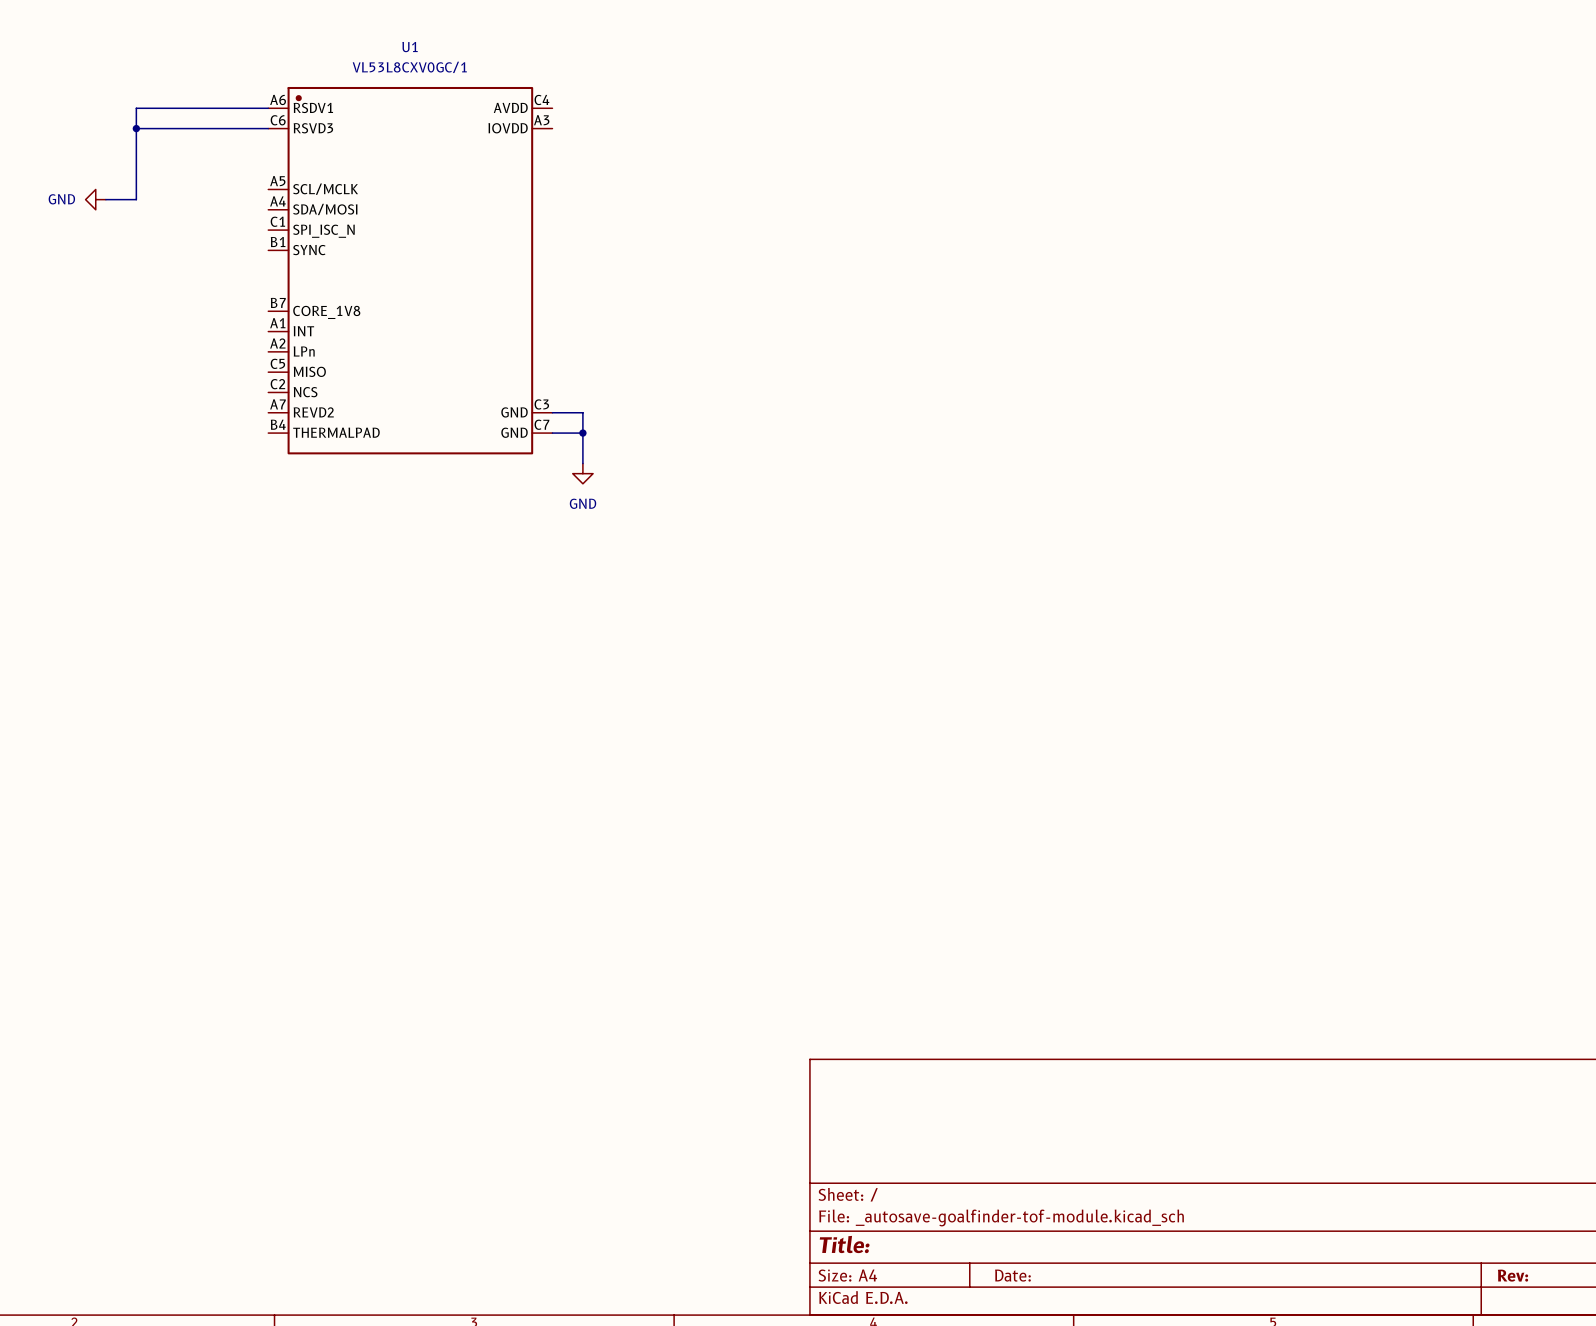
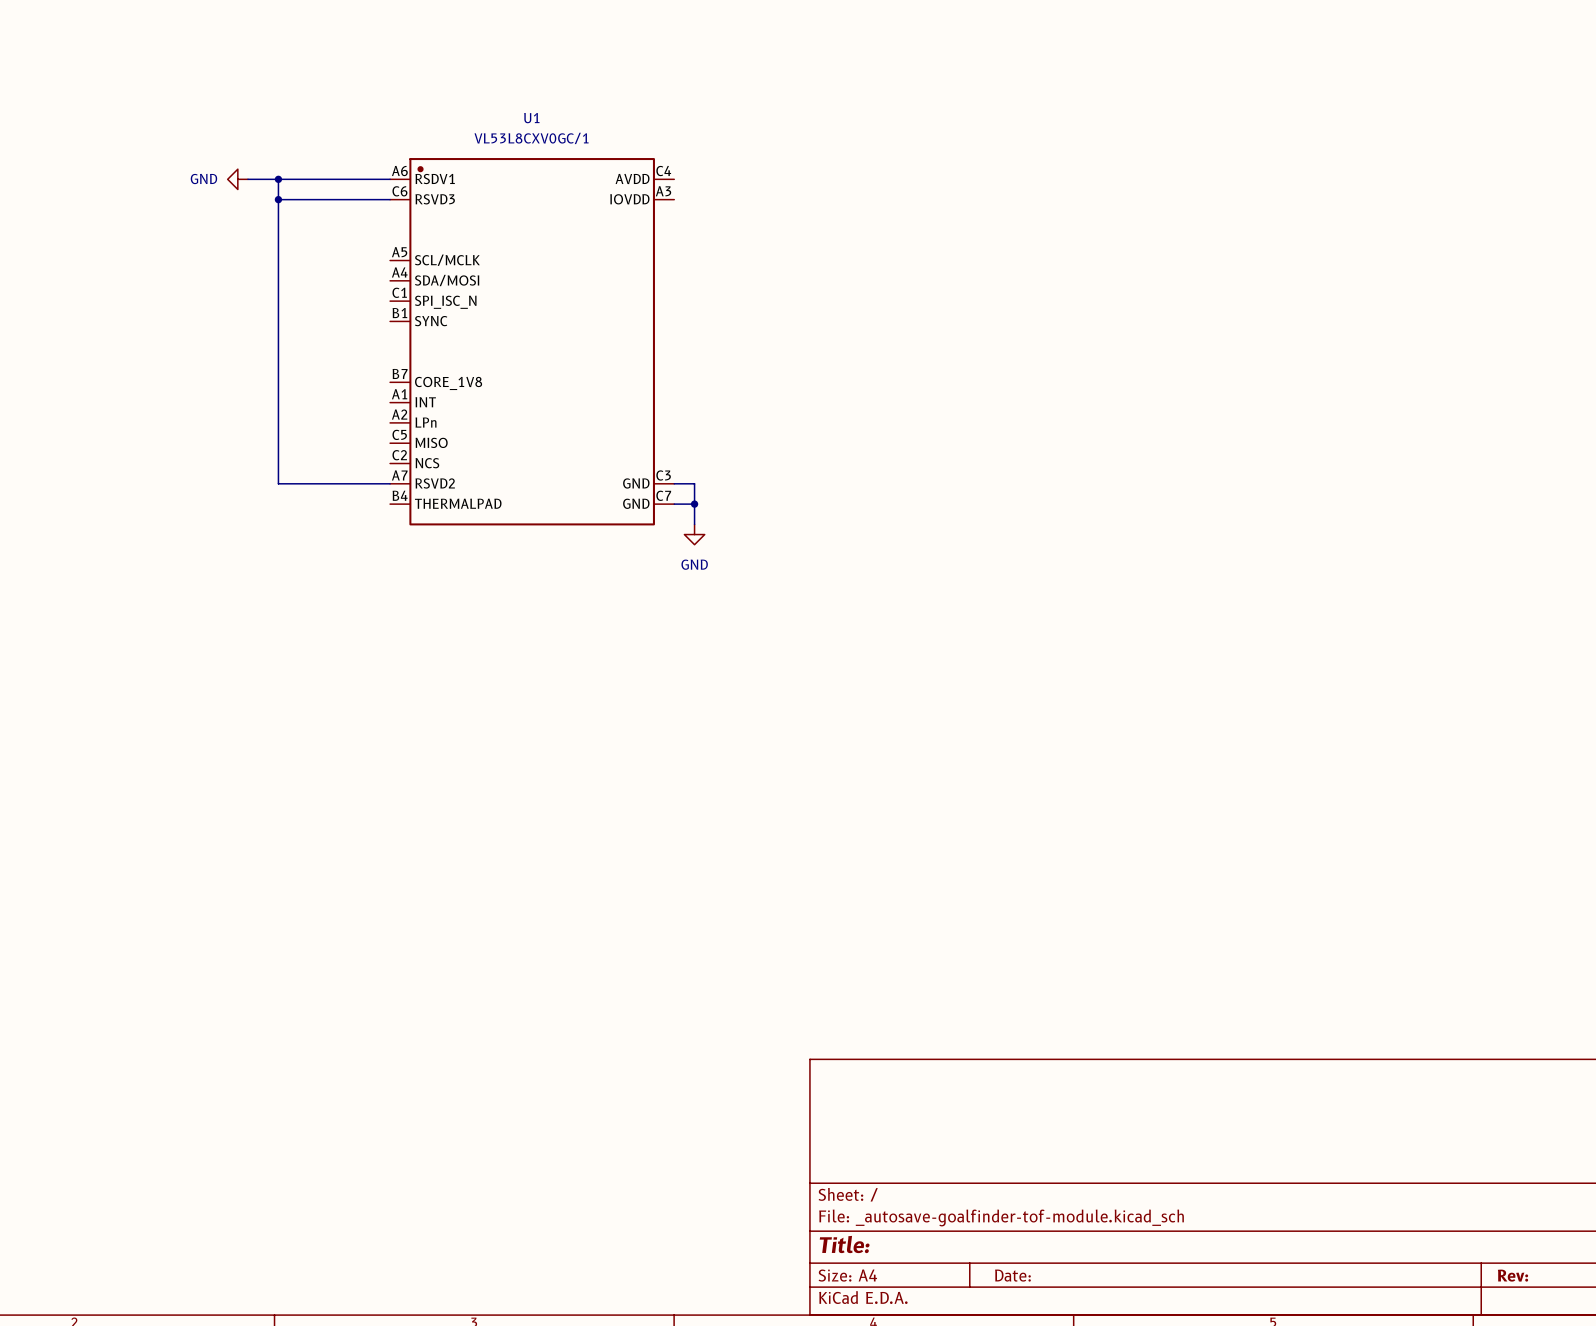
wire: (268, 108) (136, 108) (136, 199) (105, 199) -> none
wire: (136, 128) (268, 128) -> none
junction: (136, 128) -> none
wire: none -> (247, 179) (390, 179)
wire: none -> (278, 179) (278, 483) (390, 483)
junction: none -> (278, 179)
power symbol position: GND (95, 199) -> GND (237, 179)
wire: none -> (278, 199) (390, 199)
junction: none -> (278, 199)
U1 position: (410, 270) -> (532, 341)
U1 pin name: REVD2 (313, 412) -> RSVD2 (435, 483)
wire: (552, 412) (582, 412) (582, 463) -> none
wire: (552, 433) (582, 433) -> none
junction: (582, 433) -> none
power symbol position: GND (582, 473) -> GND (694, 534)
wire: none -> (674, 483) (694, 483) (694, 524)
wire: none -> (674, 504) (694, 504)
junction: none -> (694, 504)

